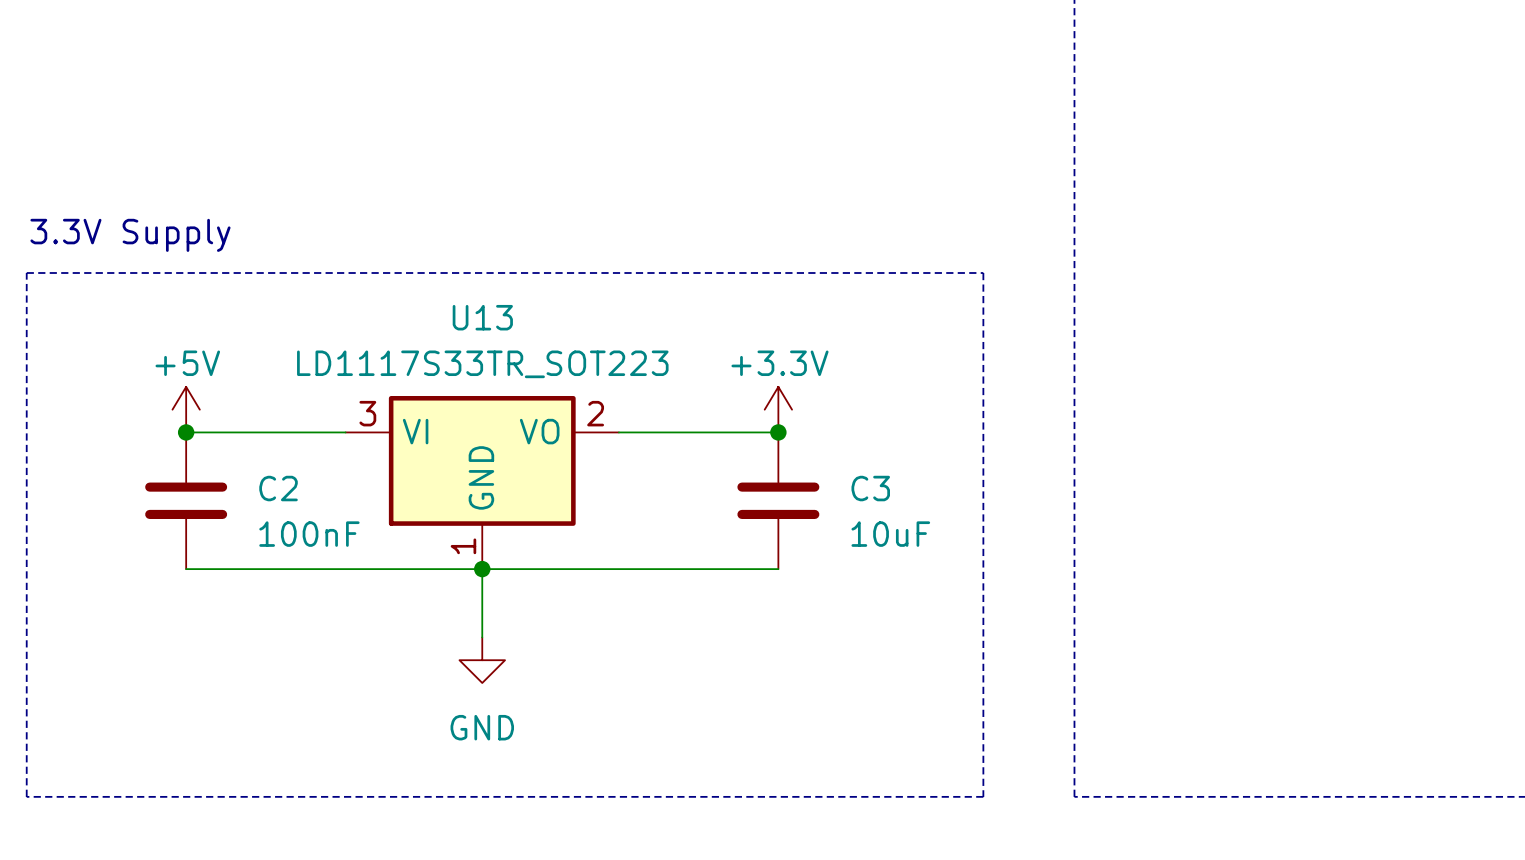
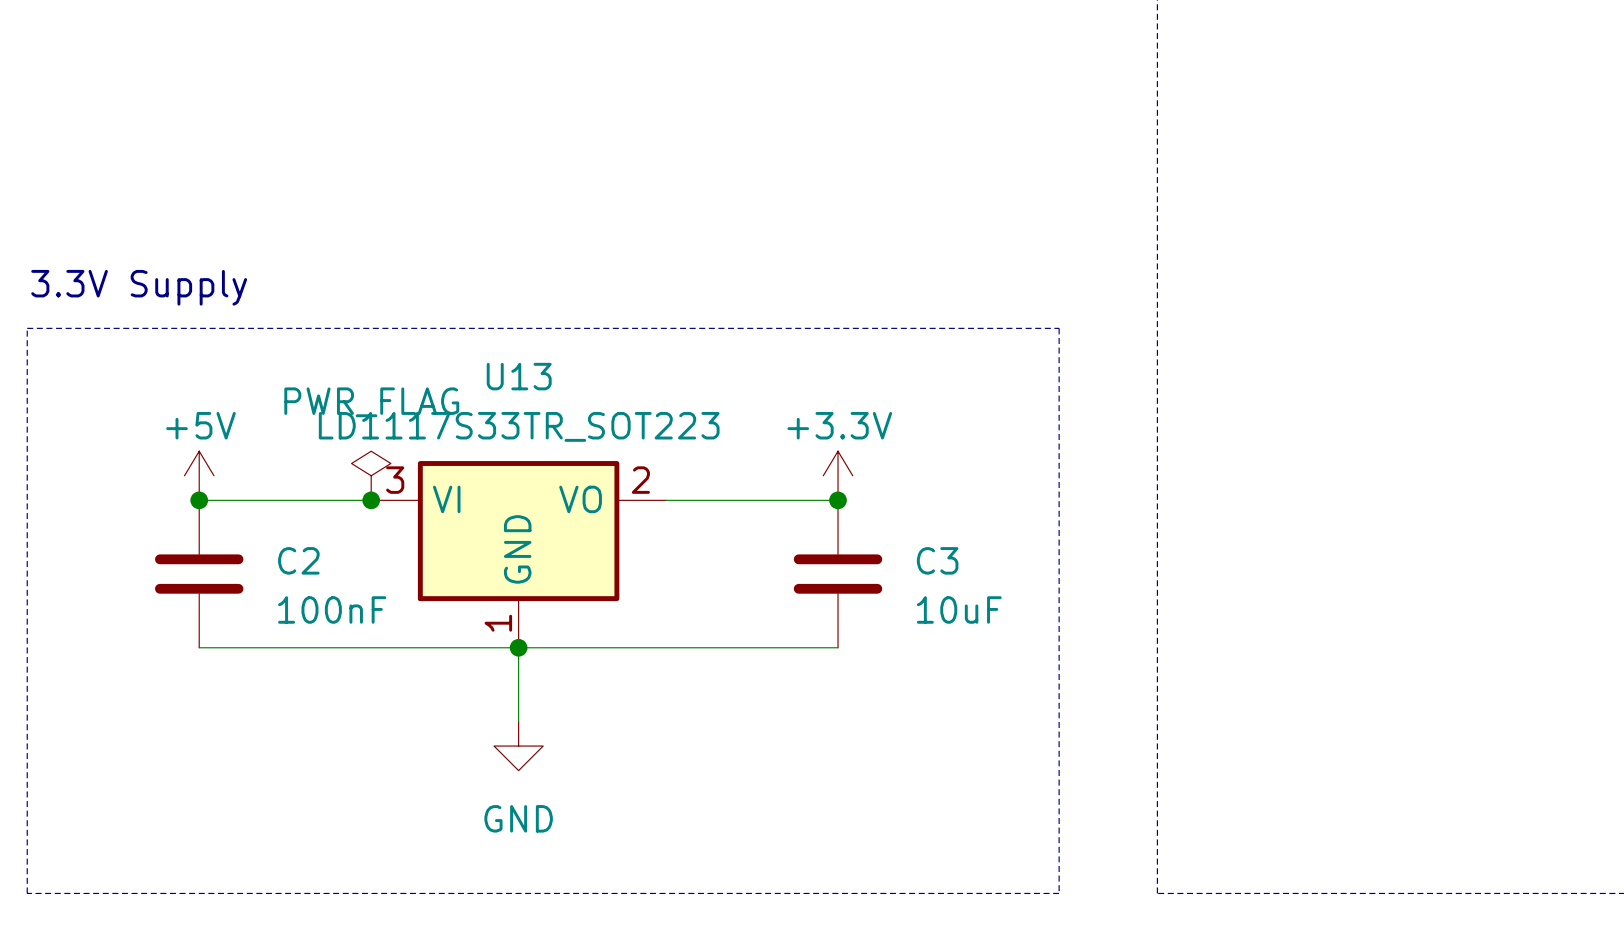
power symbol: none -> PWR_FLAG (371, 475)
junction: none -> (371, 500)

